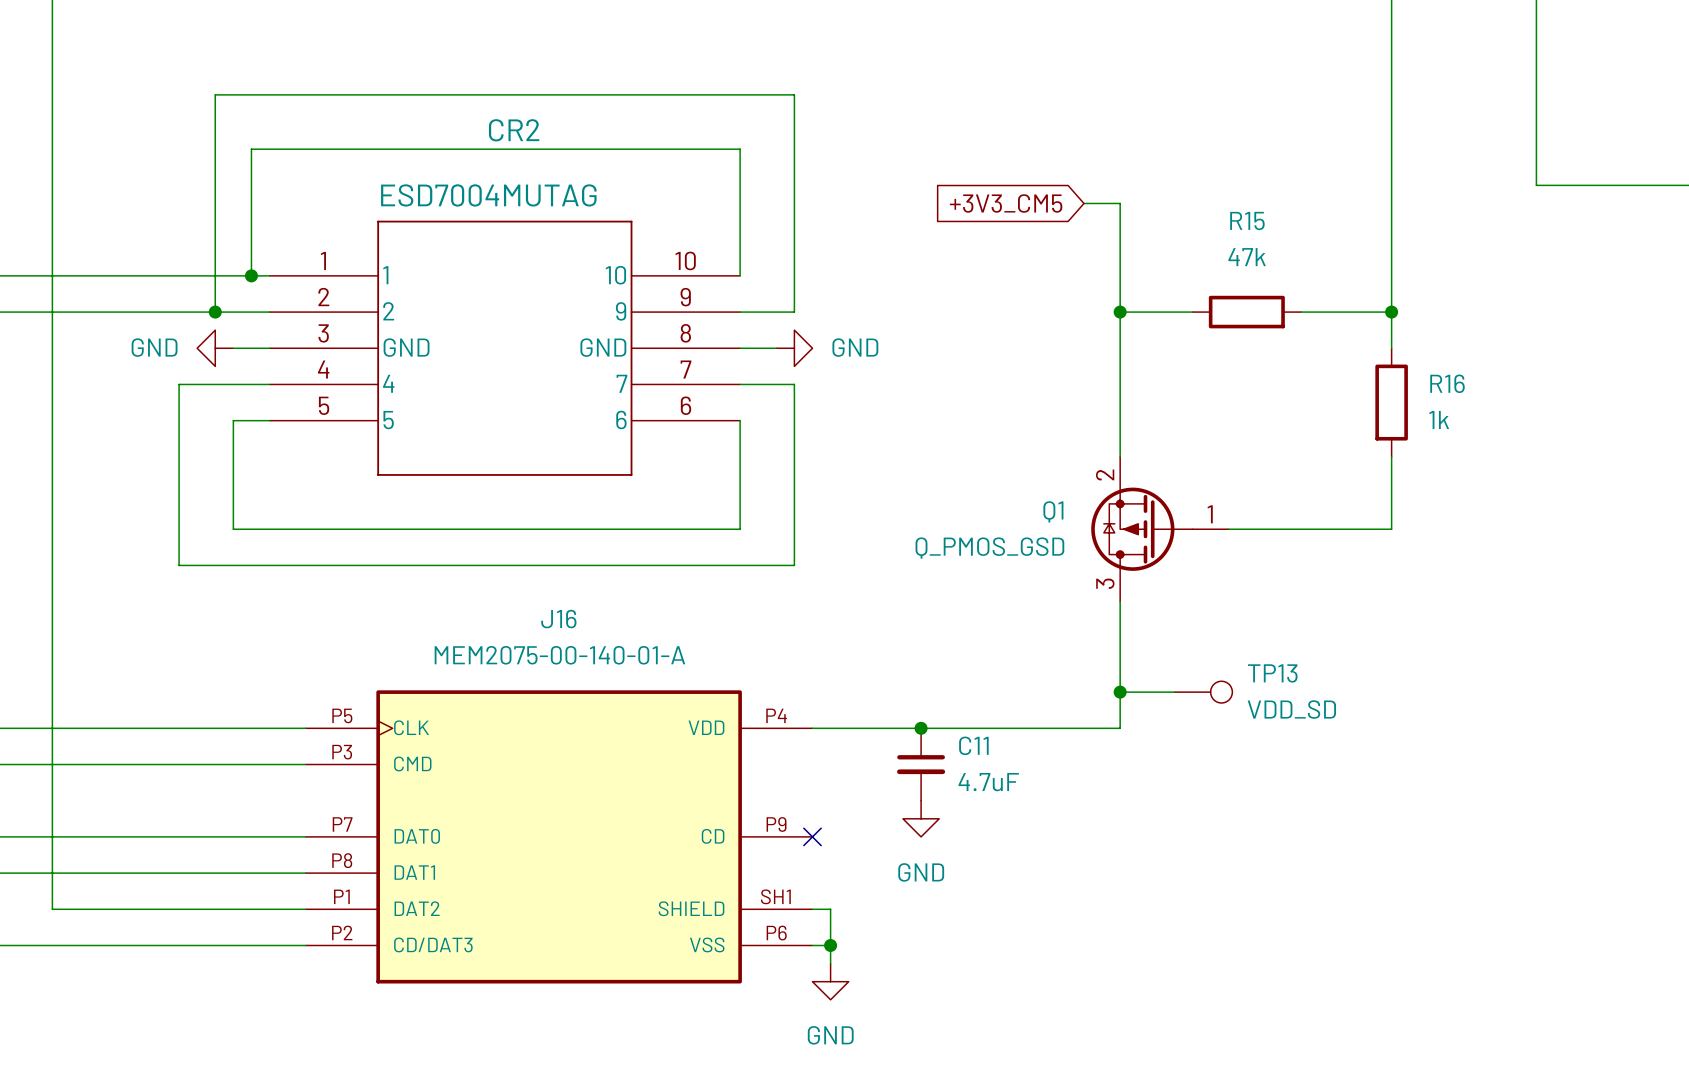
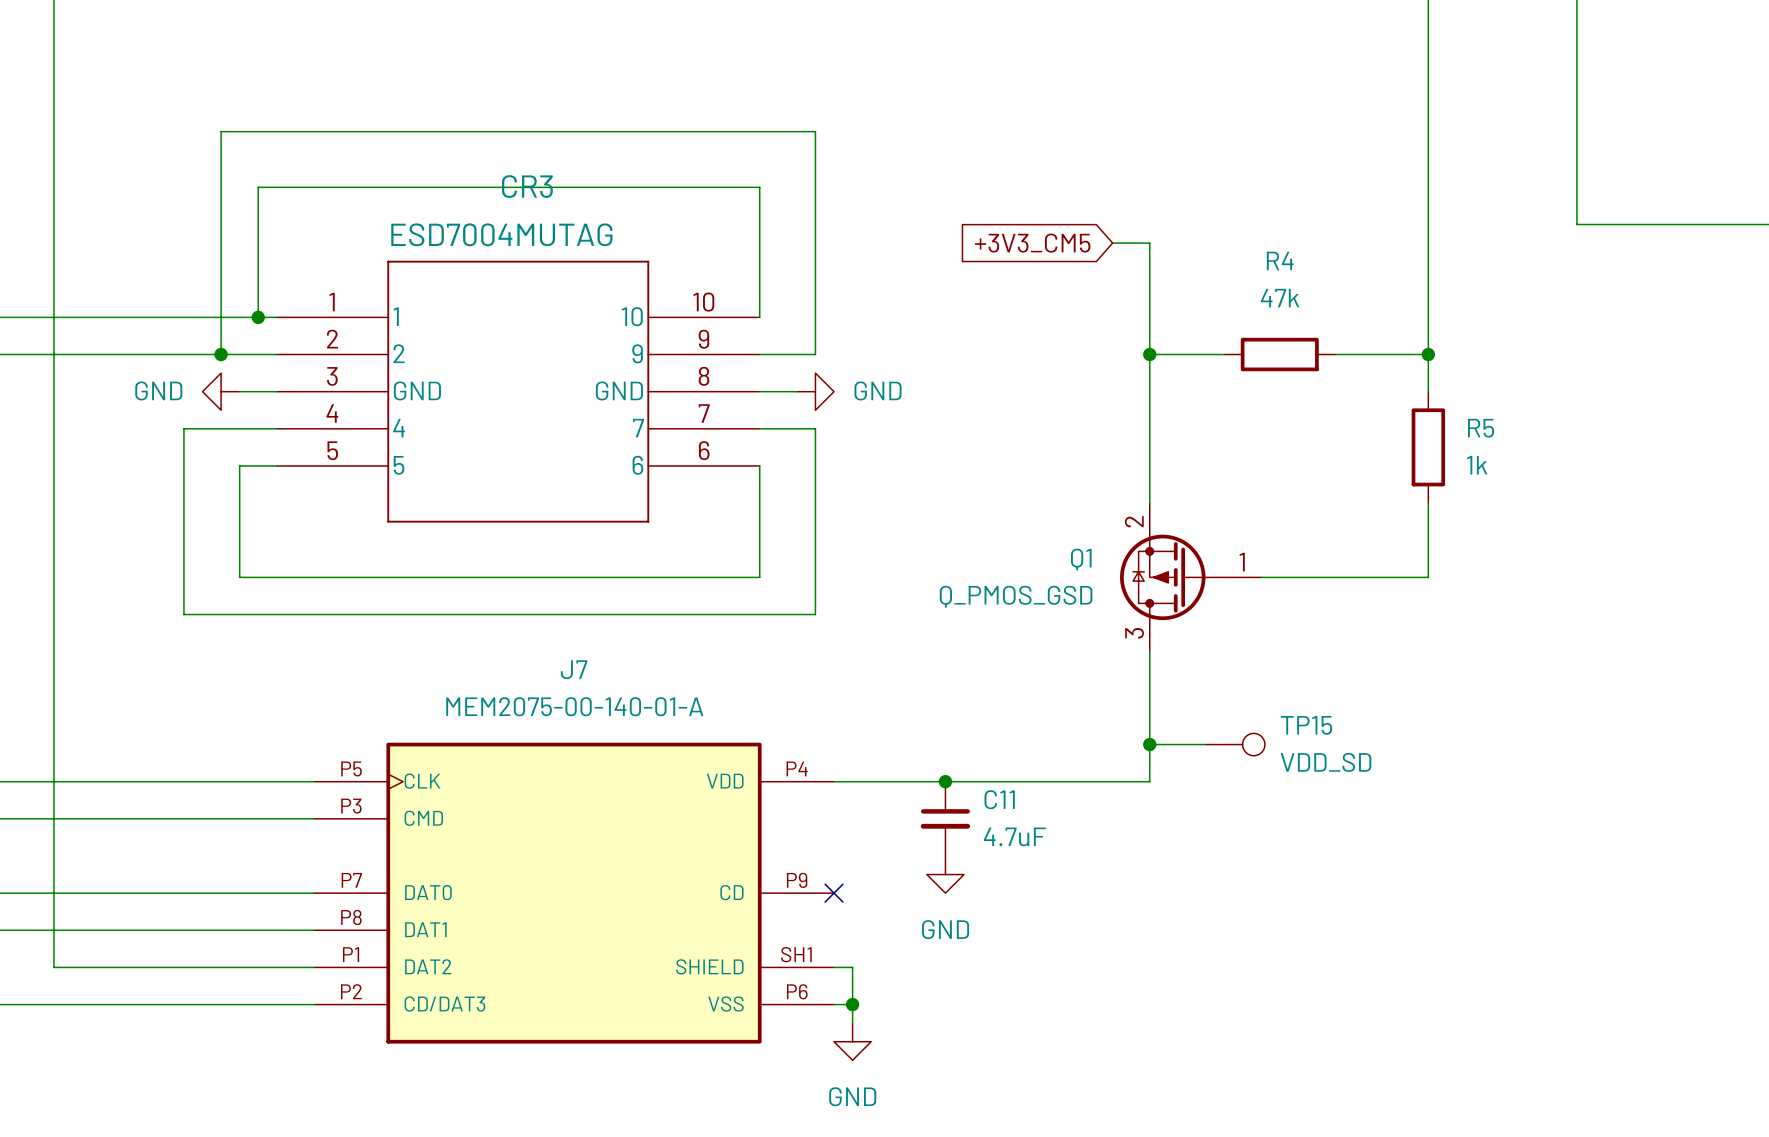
CR2 name: CR2 (514, 130) -> CR3 (527, 186)
R15 name: R15 (1247, 220) -> R4 (1280, 260)
R16 name: R16 (1447, 383) -> R5 (1481, 428)
J16 name: J16 (558, 619) -> J7 (574, 669)
TP13 name: TP13 (1272, 673) -> TP15 (1306, 725)

